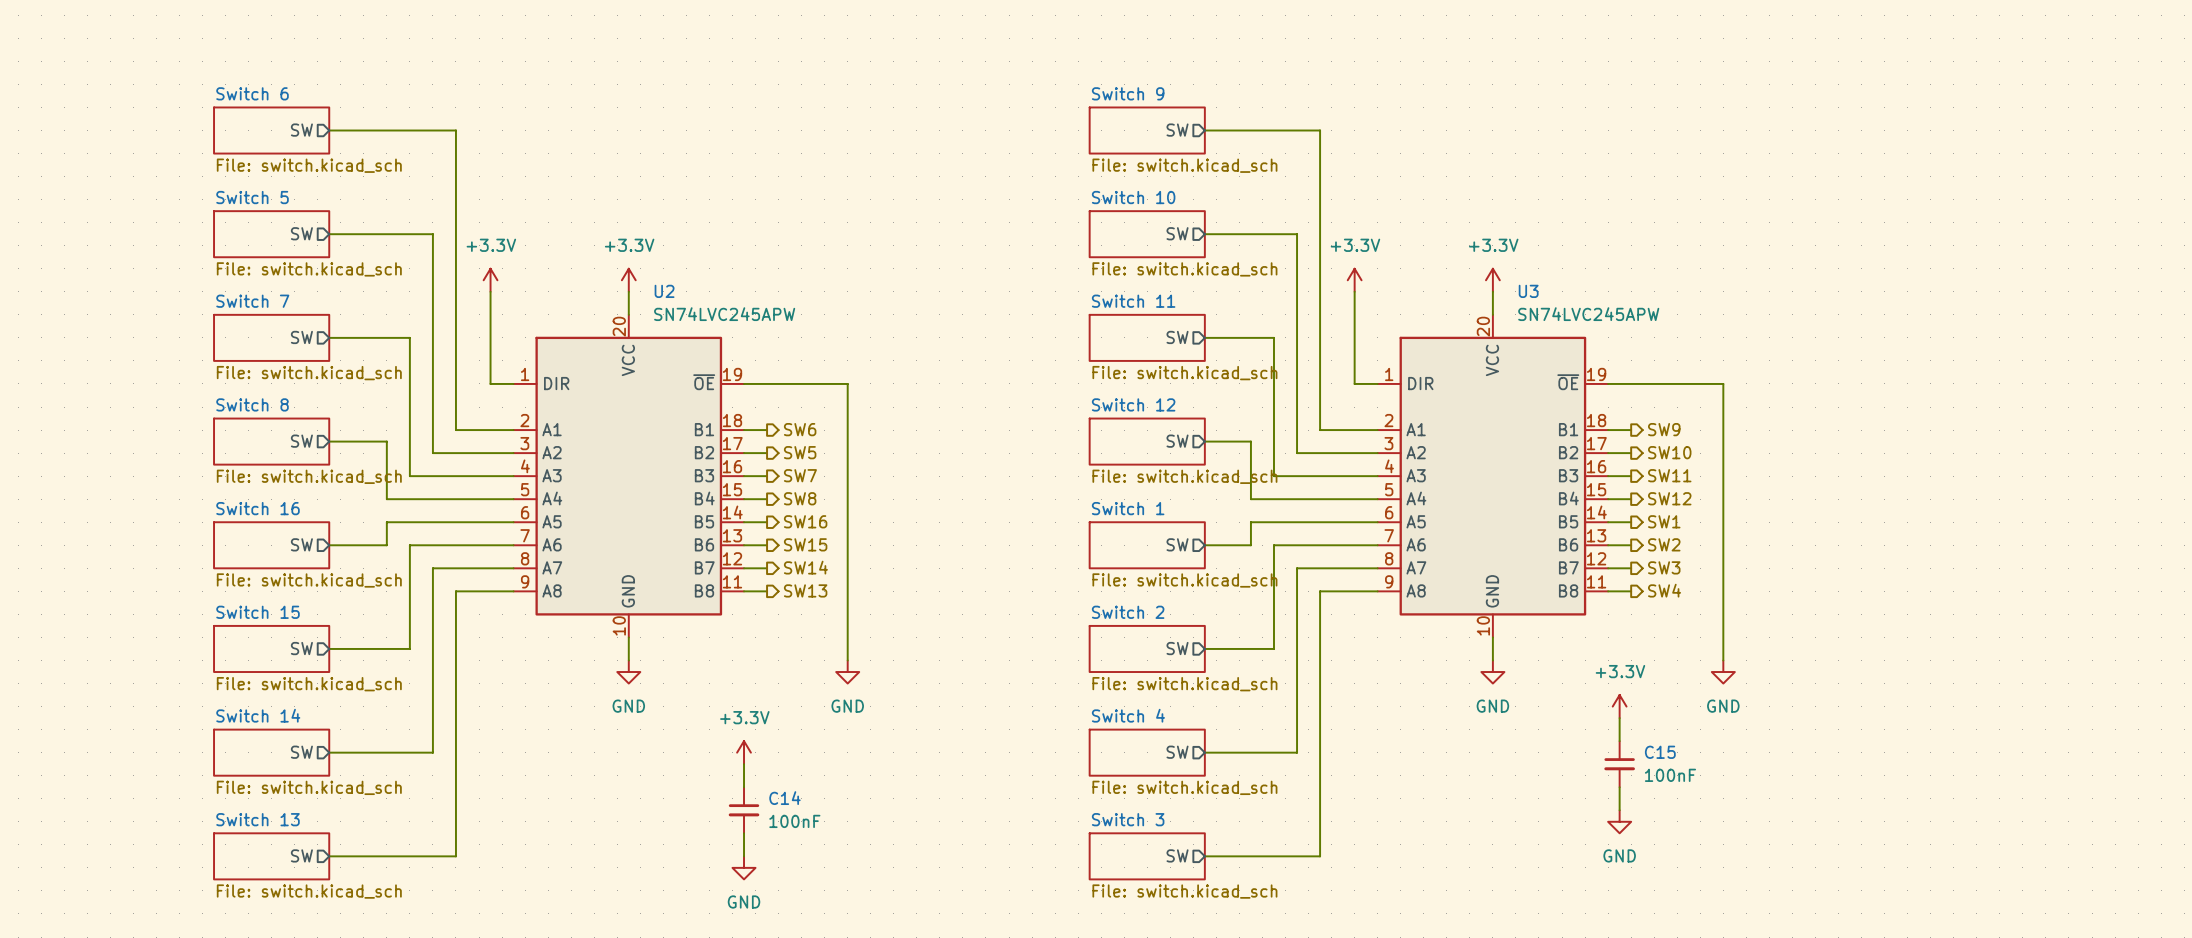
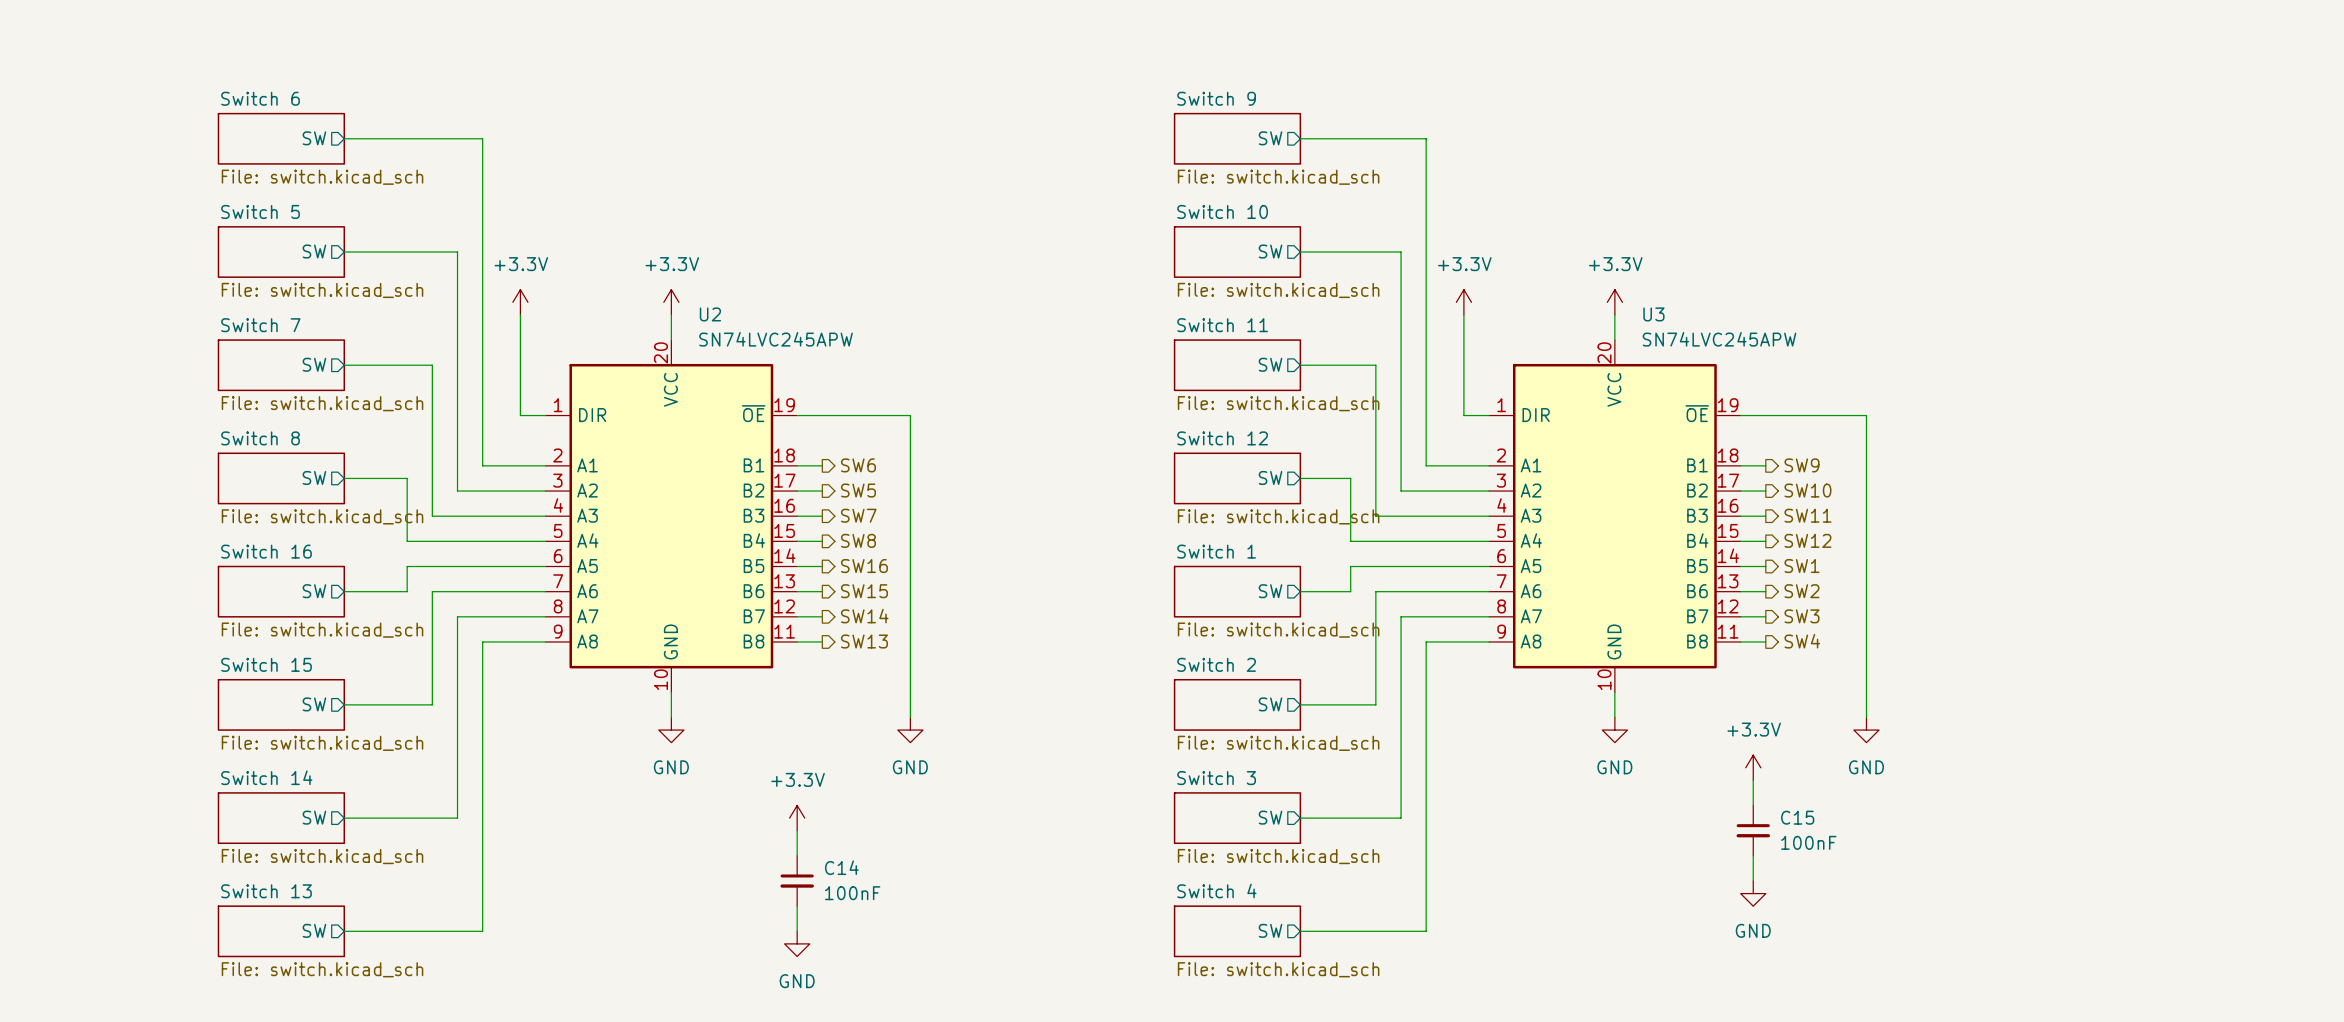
sheet Switch 4 name: Switch 4 (1128, 715) -> Switch 3 (1216, 778)
sheet Switch 3 name: Switch 3 (1128, 819) -> Switch 4 (1216, 890)

